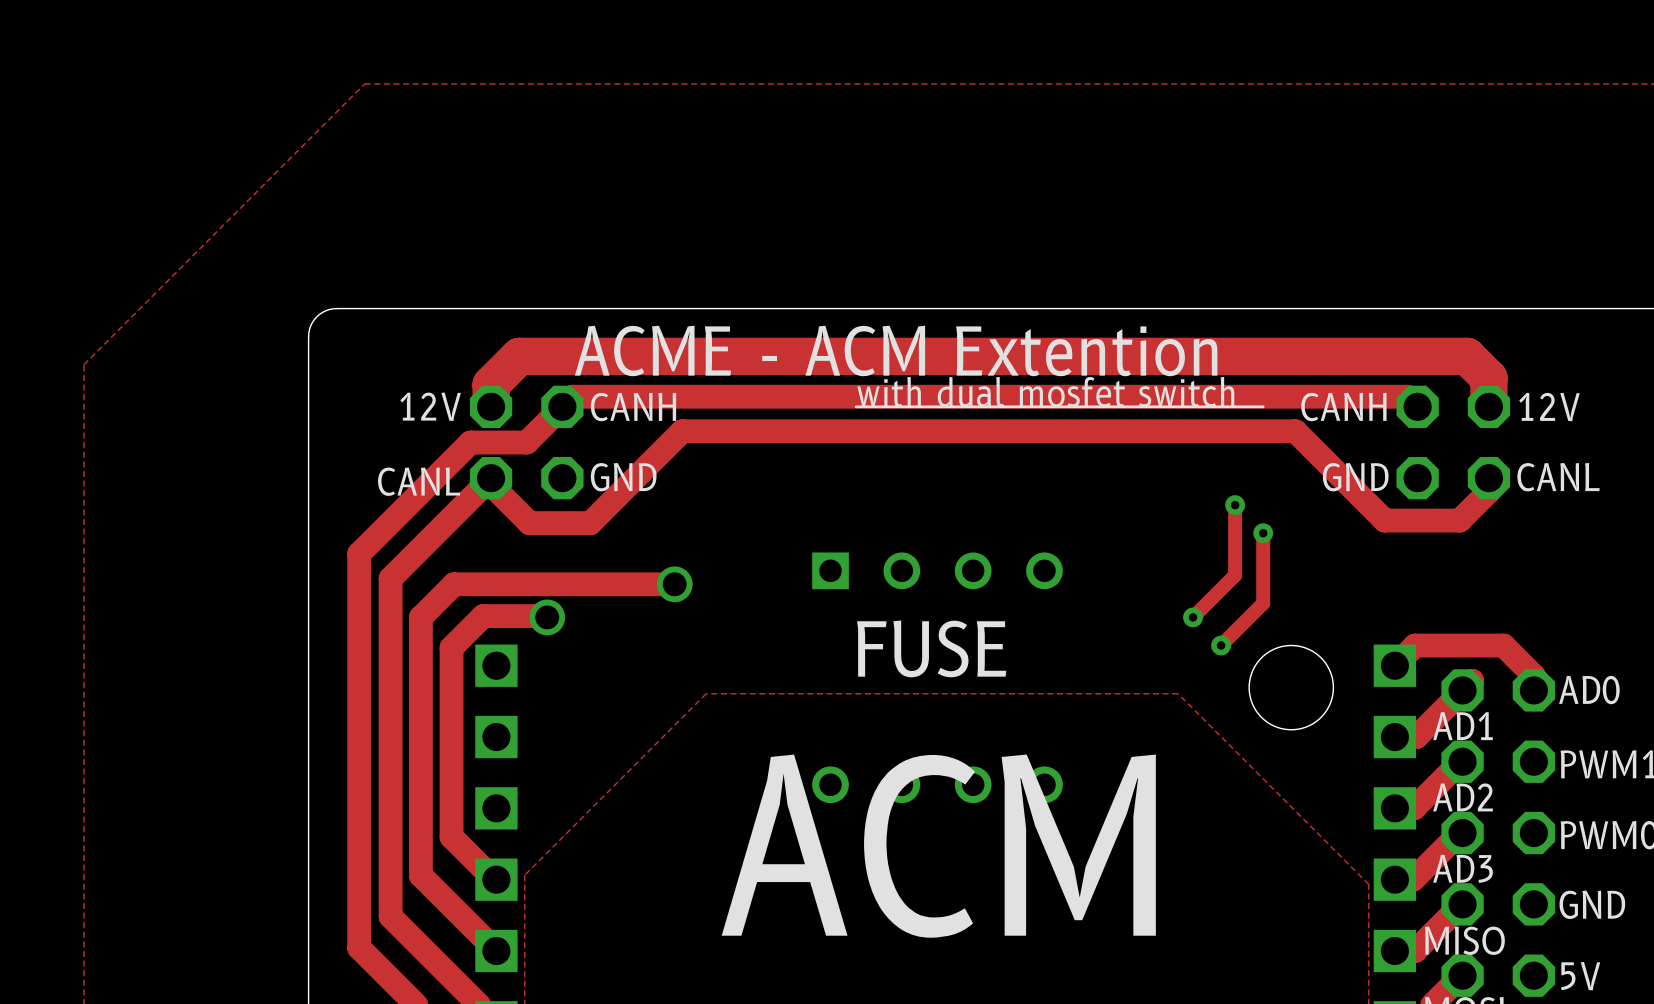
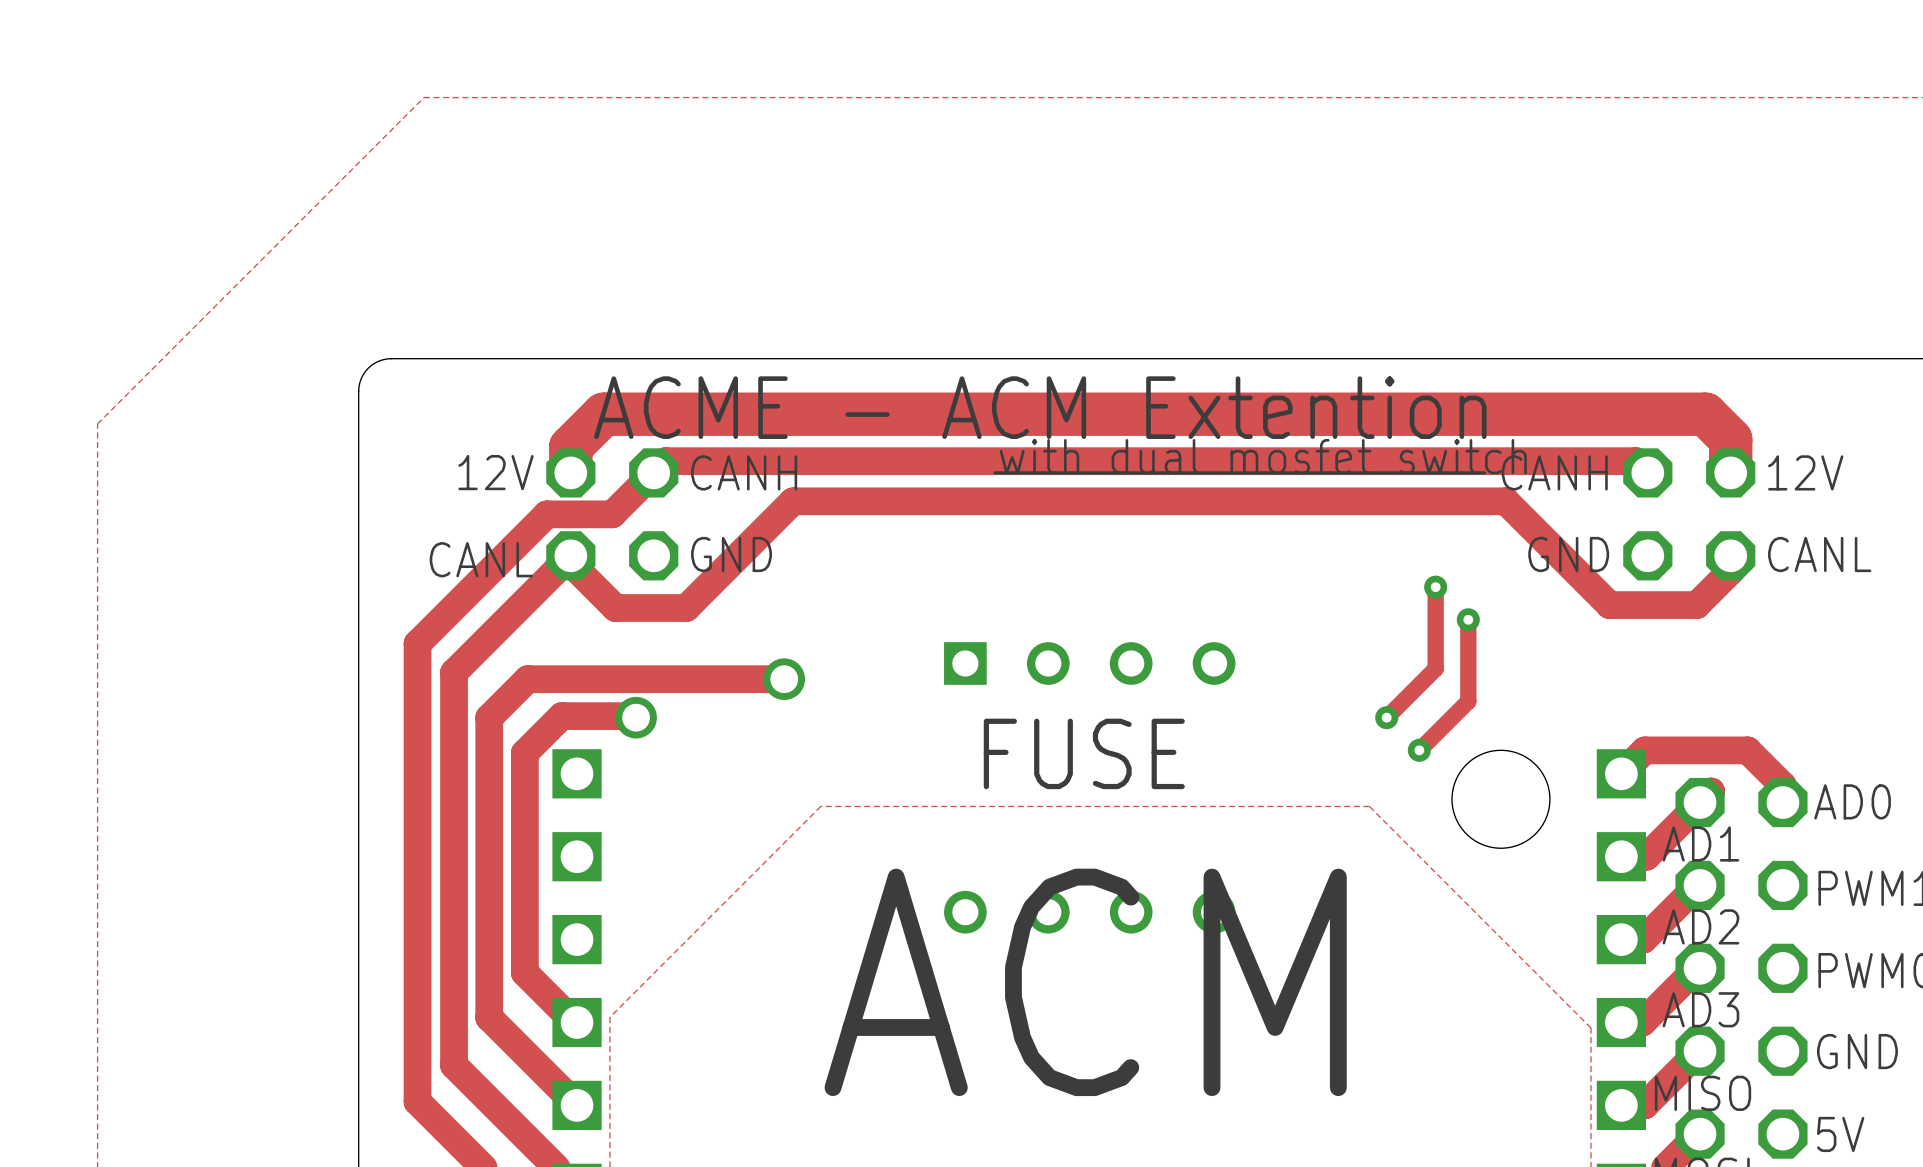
line: none -> (1468, 472) (1484, 472)

